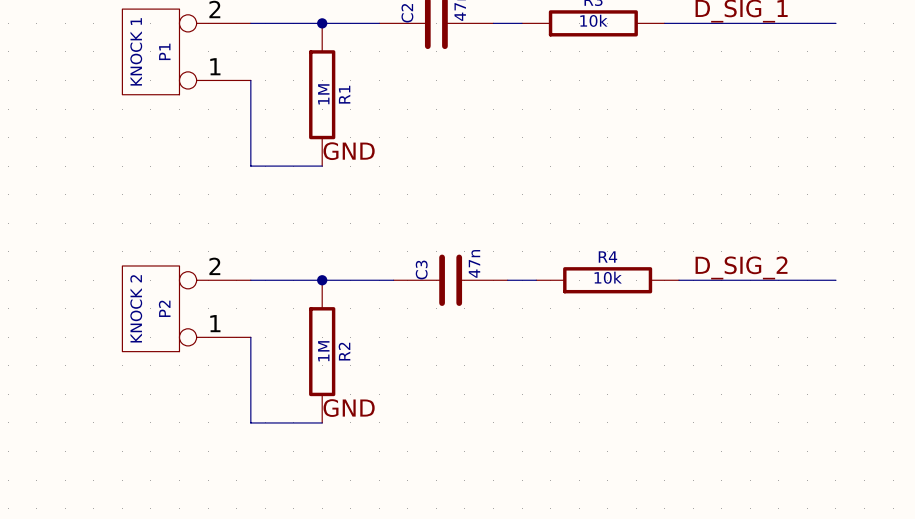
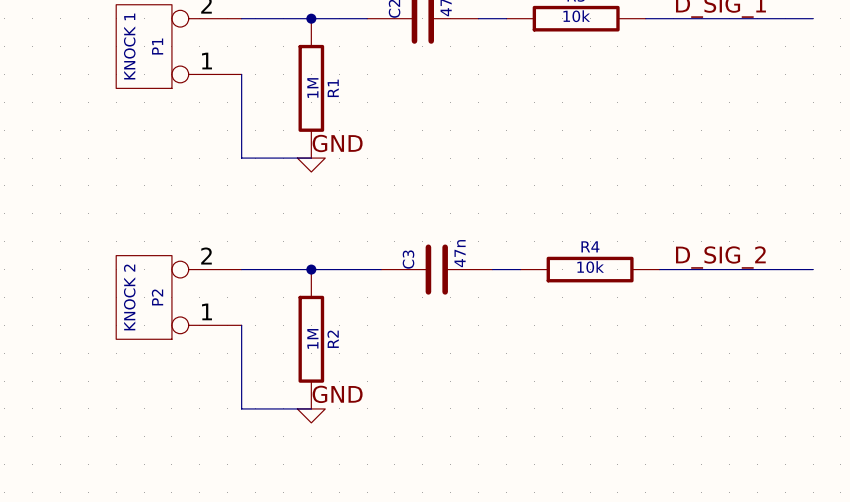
power symbol: none -> (311, 165)
power symbol: none -> (311, 415)

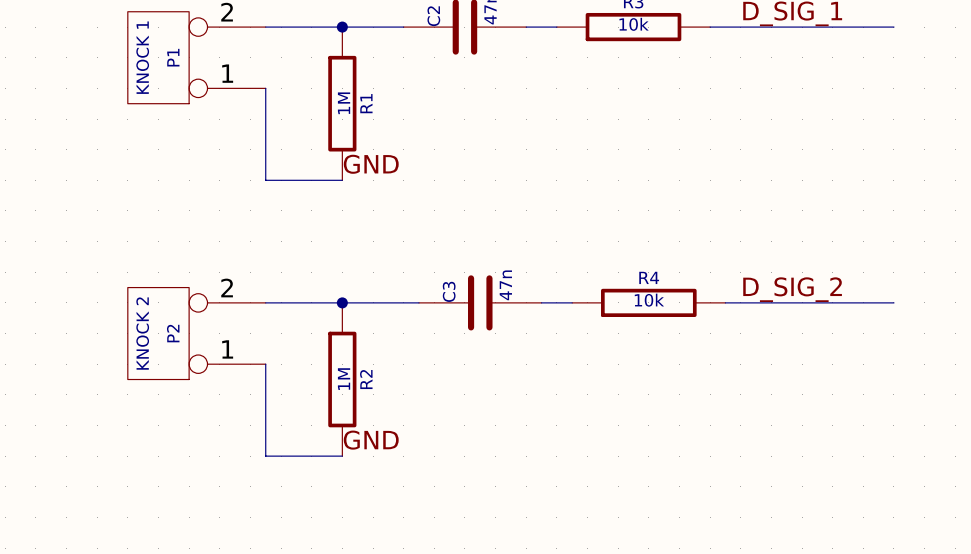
power symbol: (311, 165) -> none
power symbol: (311, 415) -> none

